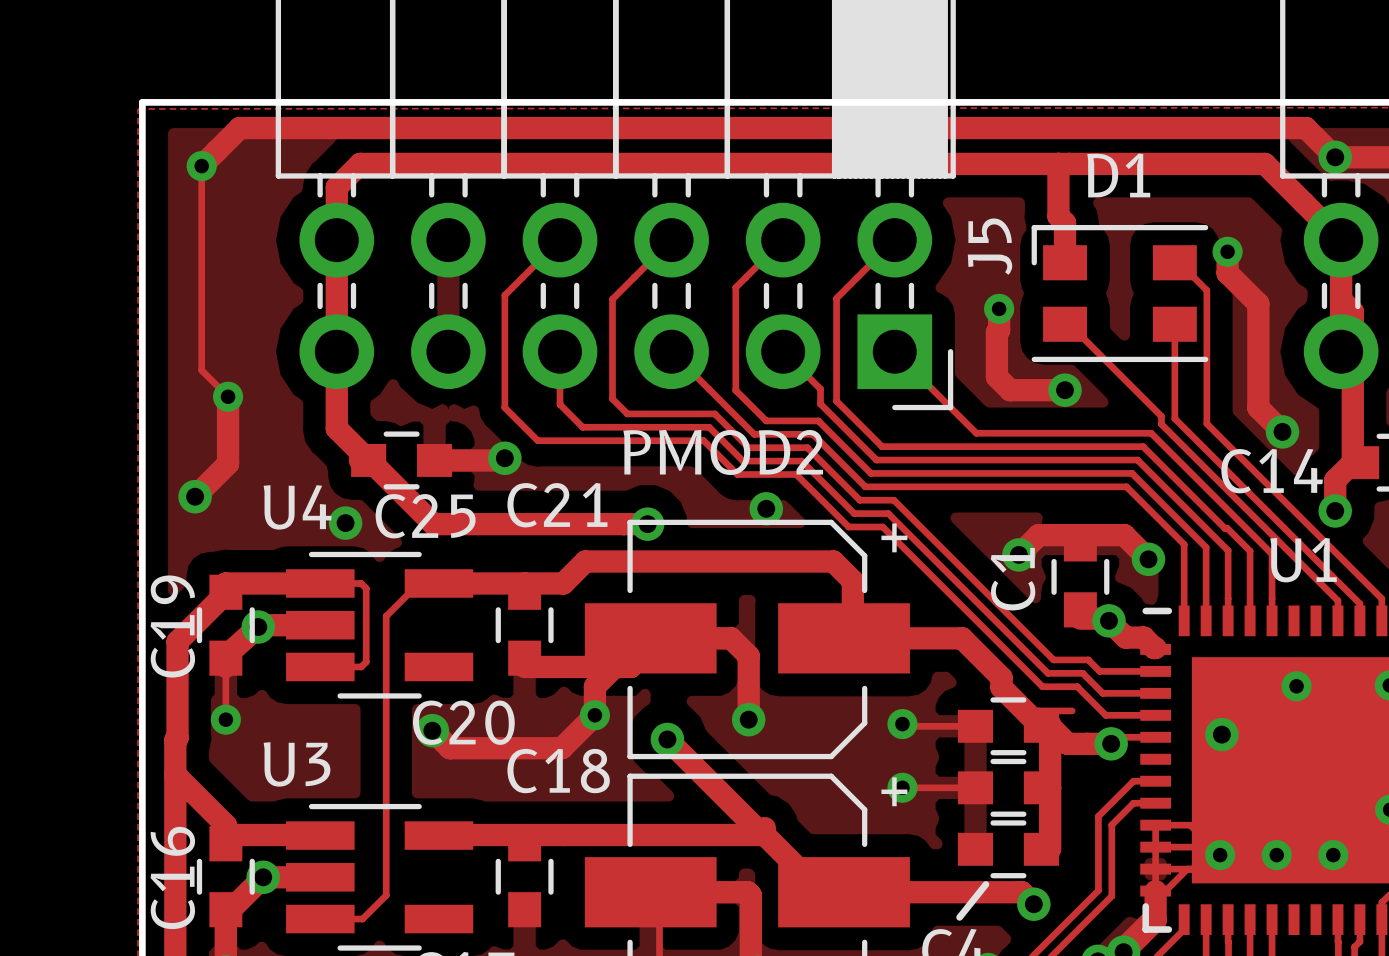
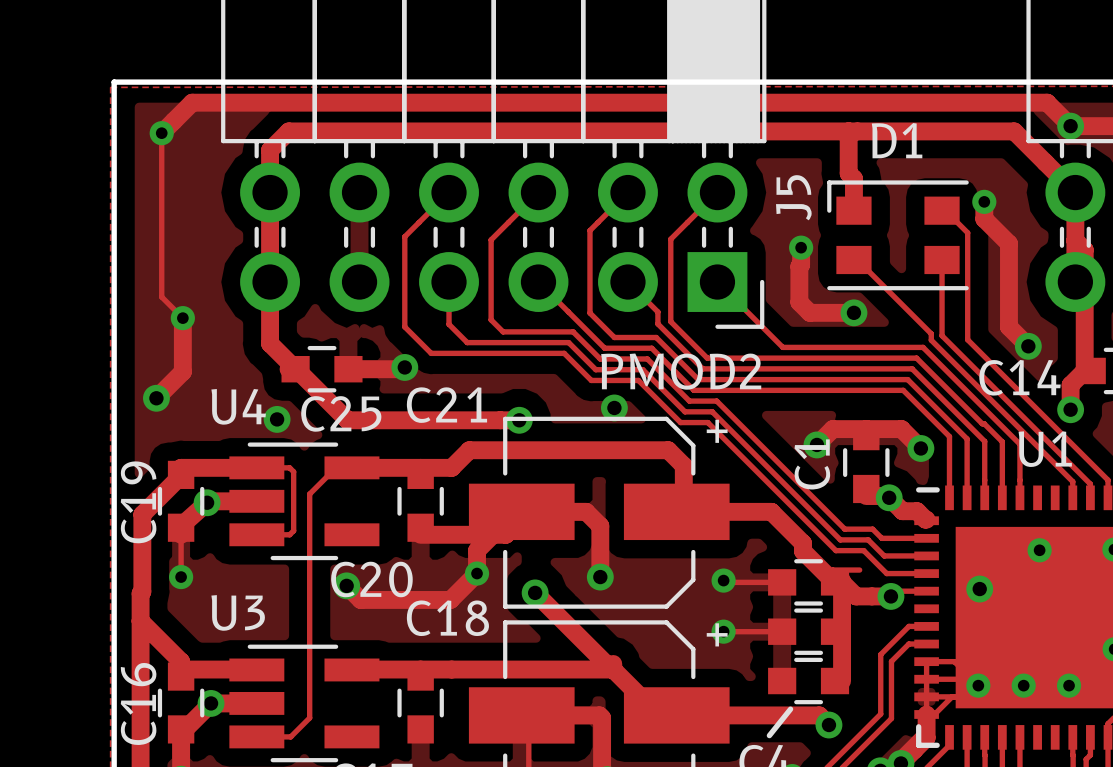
text position: PMOD2 (723, 452) -> PMOD2 (681, 371)

